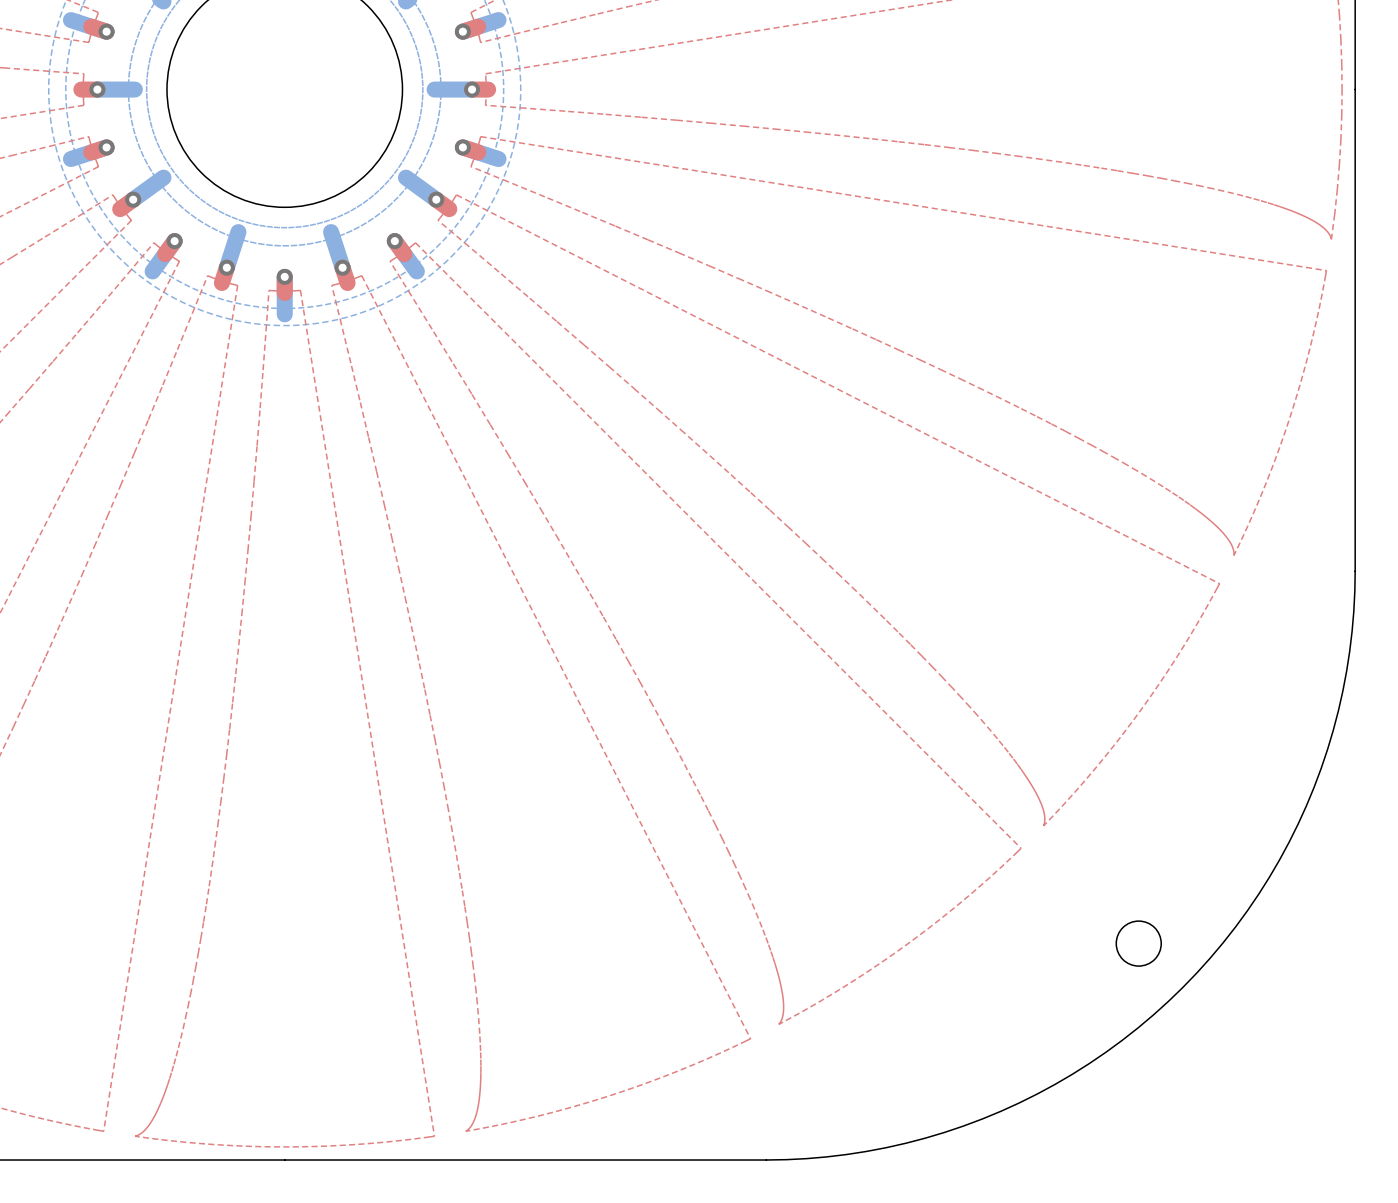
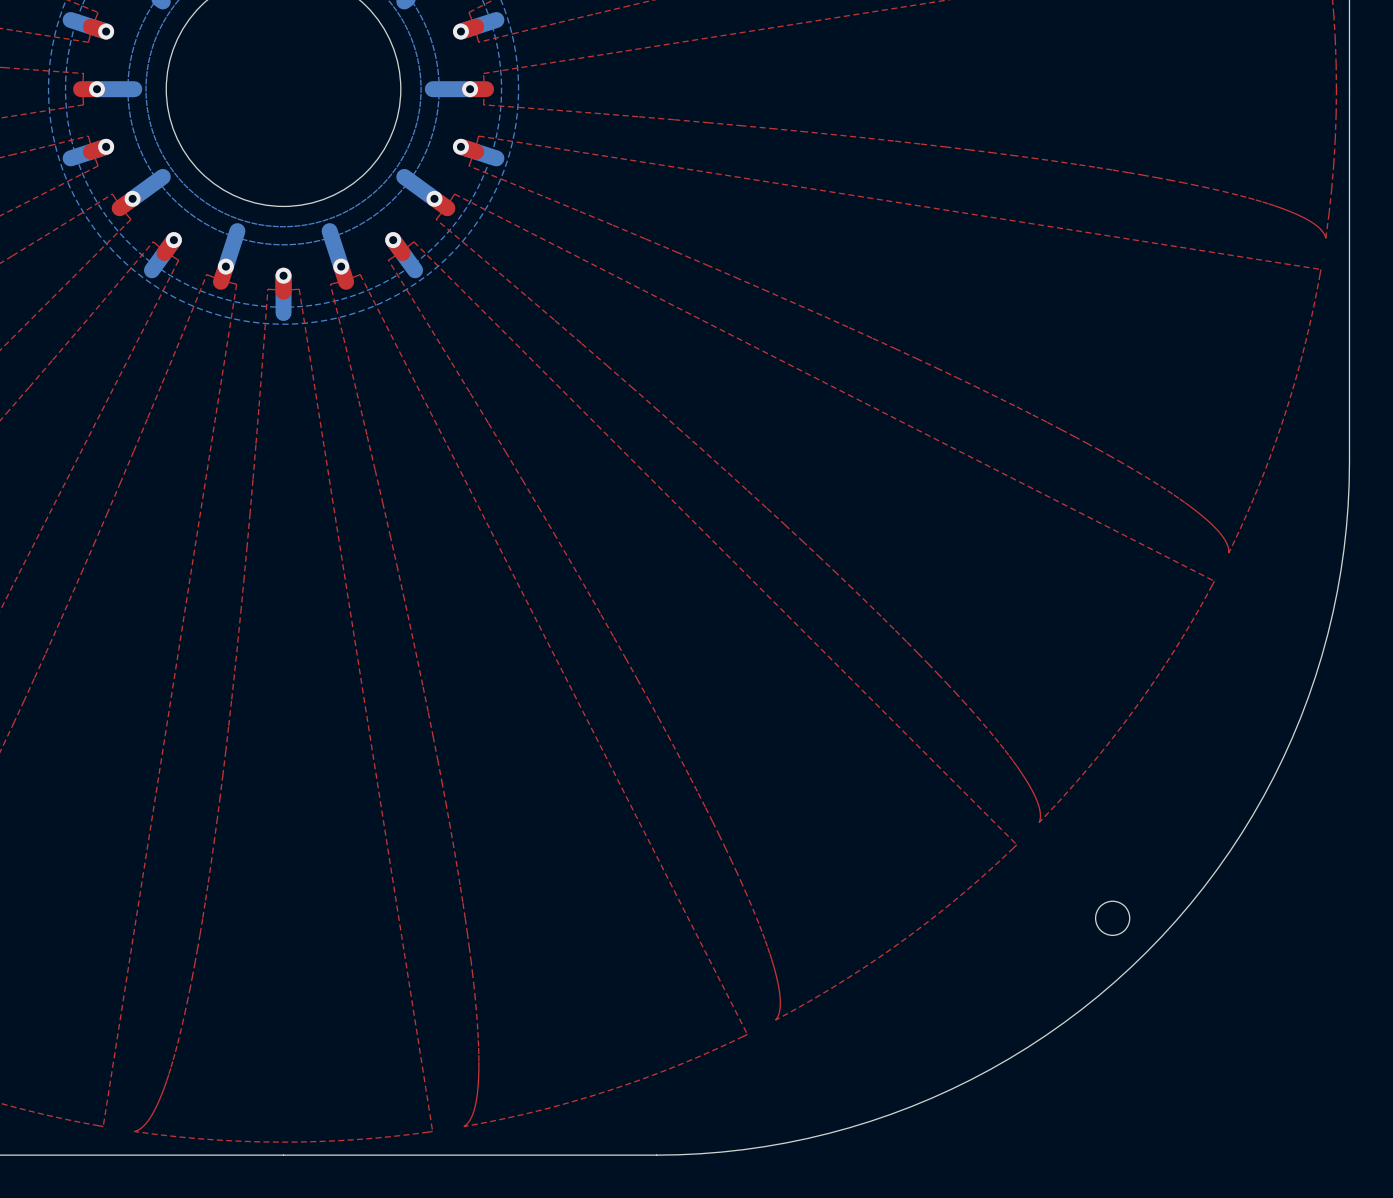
board edge: (1355, 464) (1354, 591) (1352, 631) (1342, 691) (1327, 749) (1306, 805) (1269, 877) (1235, 927) (1182, 987) (1122, 1040) (1072, 1074) (1000, 1111) (944, 1132) (886, 1147) (826, 1156) (786, 1159) (659, 1160) -> (1349, 462) (1346, 527) (1337, 592) (1321, 655) (1300, 717) (1263, 796) (1229, 851) (1190, 903) (1146, 952) (1098, 996) (1027, 1047) (971, 1079) (911, 1106) (849, 1127) (786, 1142) (721, 1152) (656, 1155)
round board edge: none -> [1095, 900, 1130, 936]
round board edge: [1116, 920, 1162, 967] -> none

